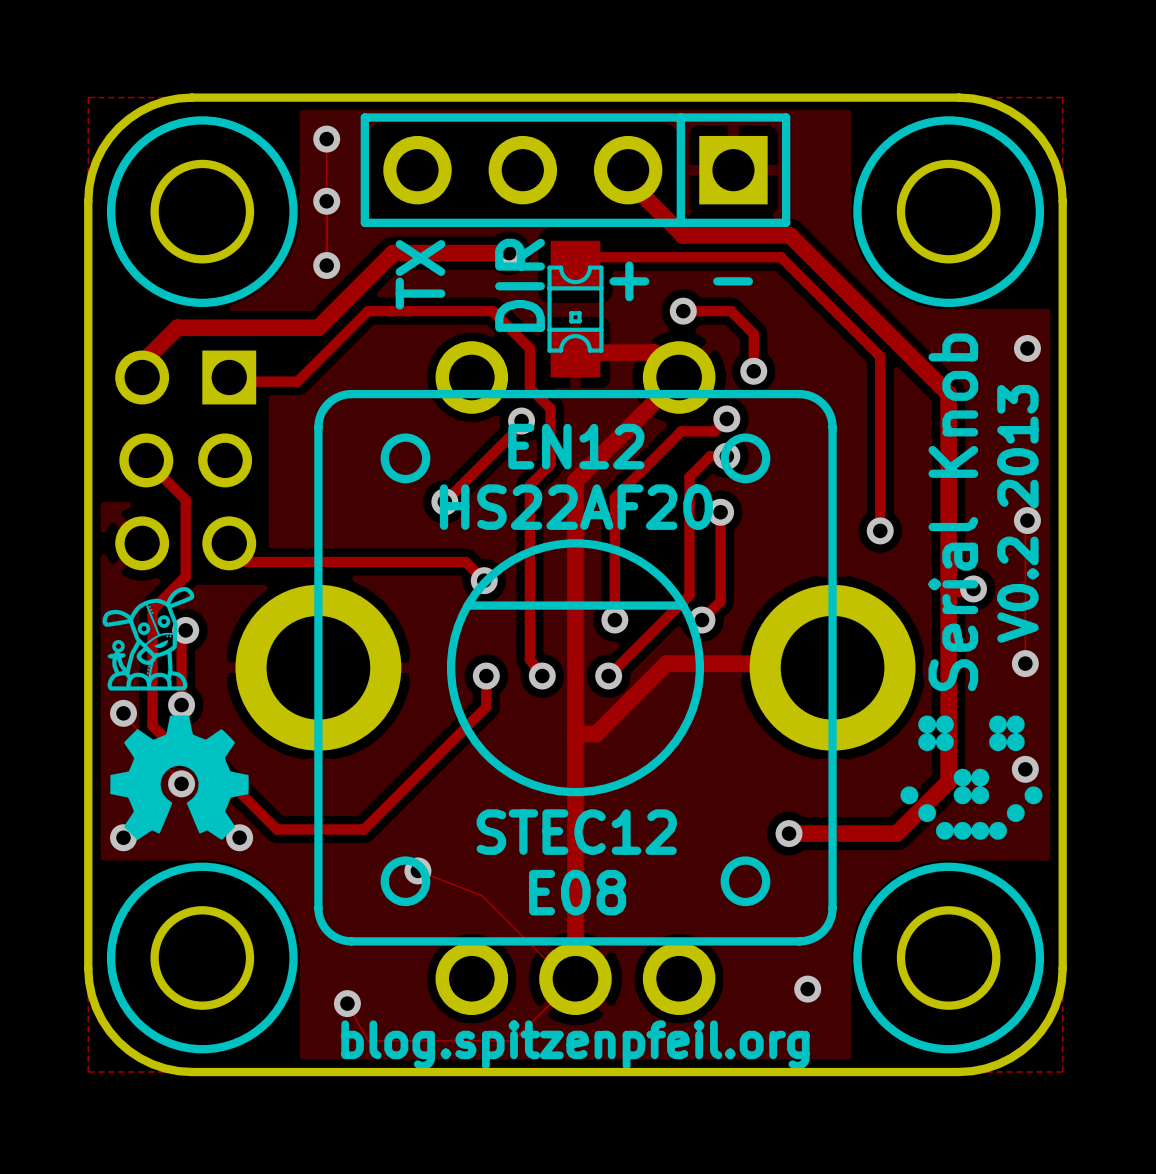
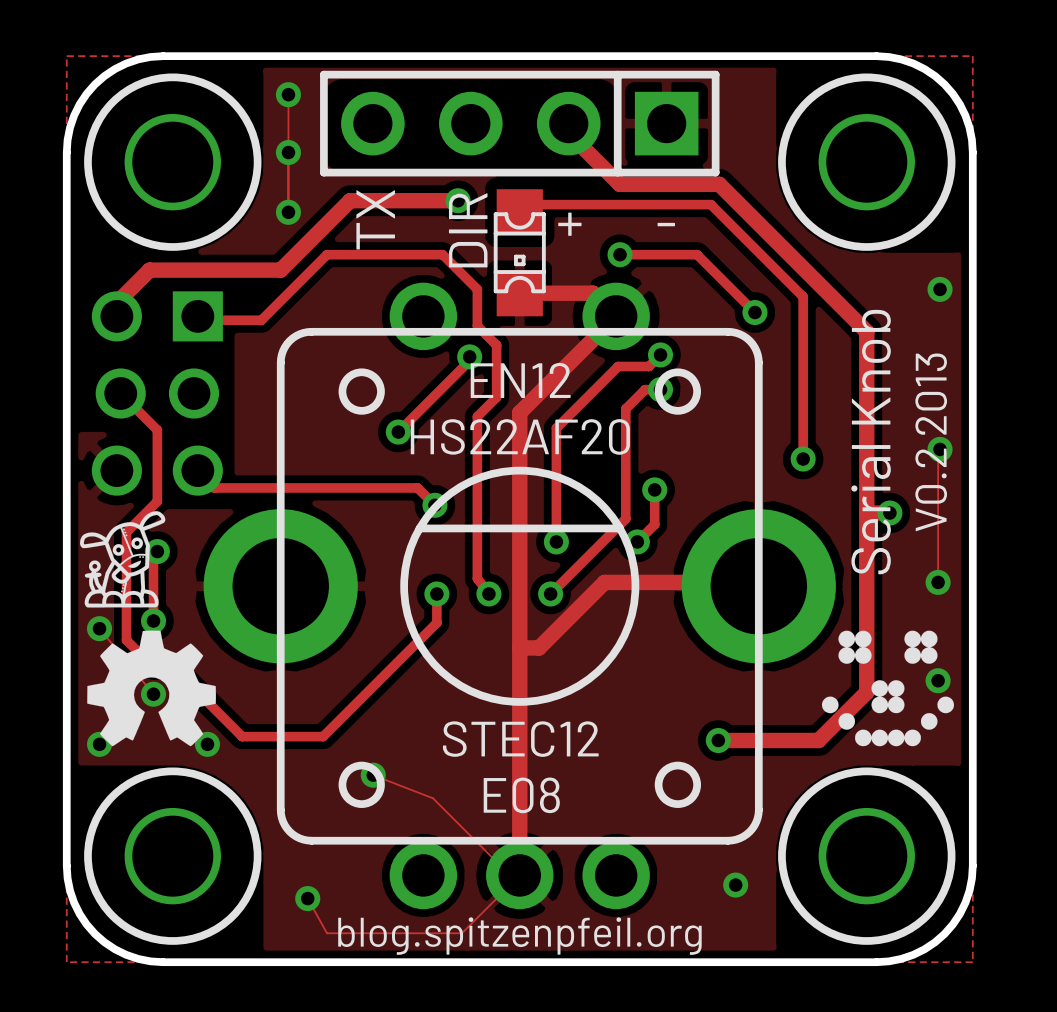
track: (730, 311) (753, 333) (753, 371) -> (664, 254) (697, 254) (754, 312)
via position: (753, 371) -> (754, 312)
track: (720, 512) (720, 564) -> none
via position: (720, 512) -> (654, 489)

